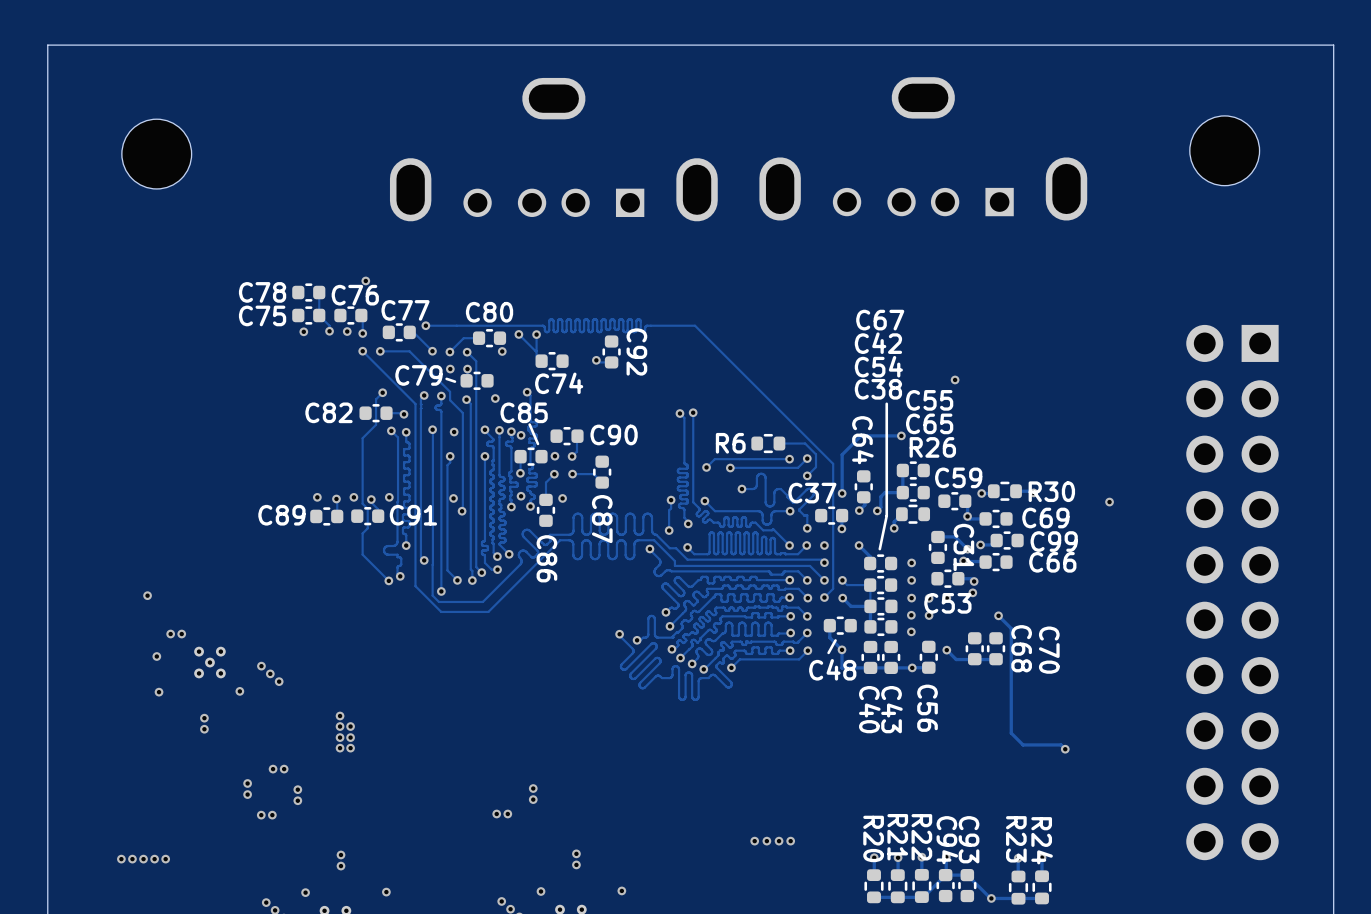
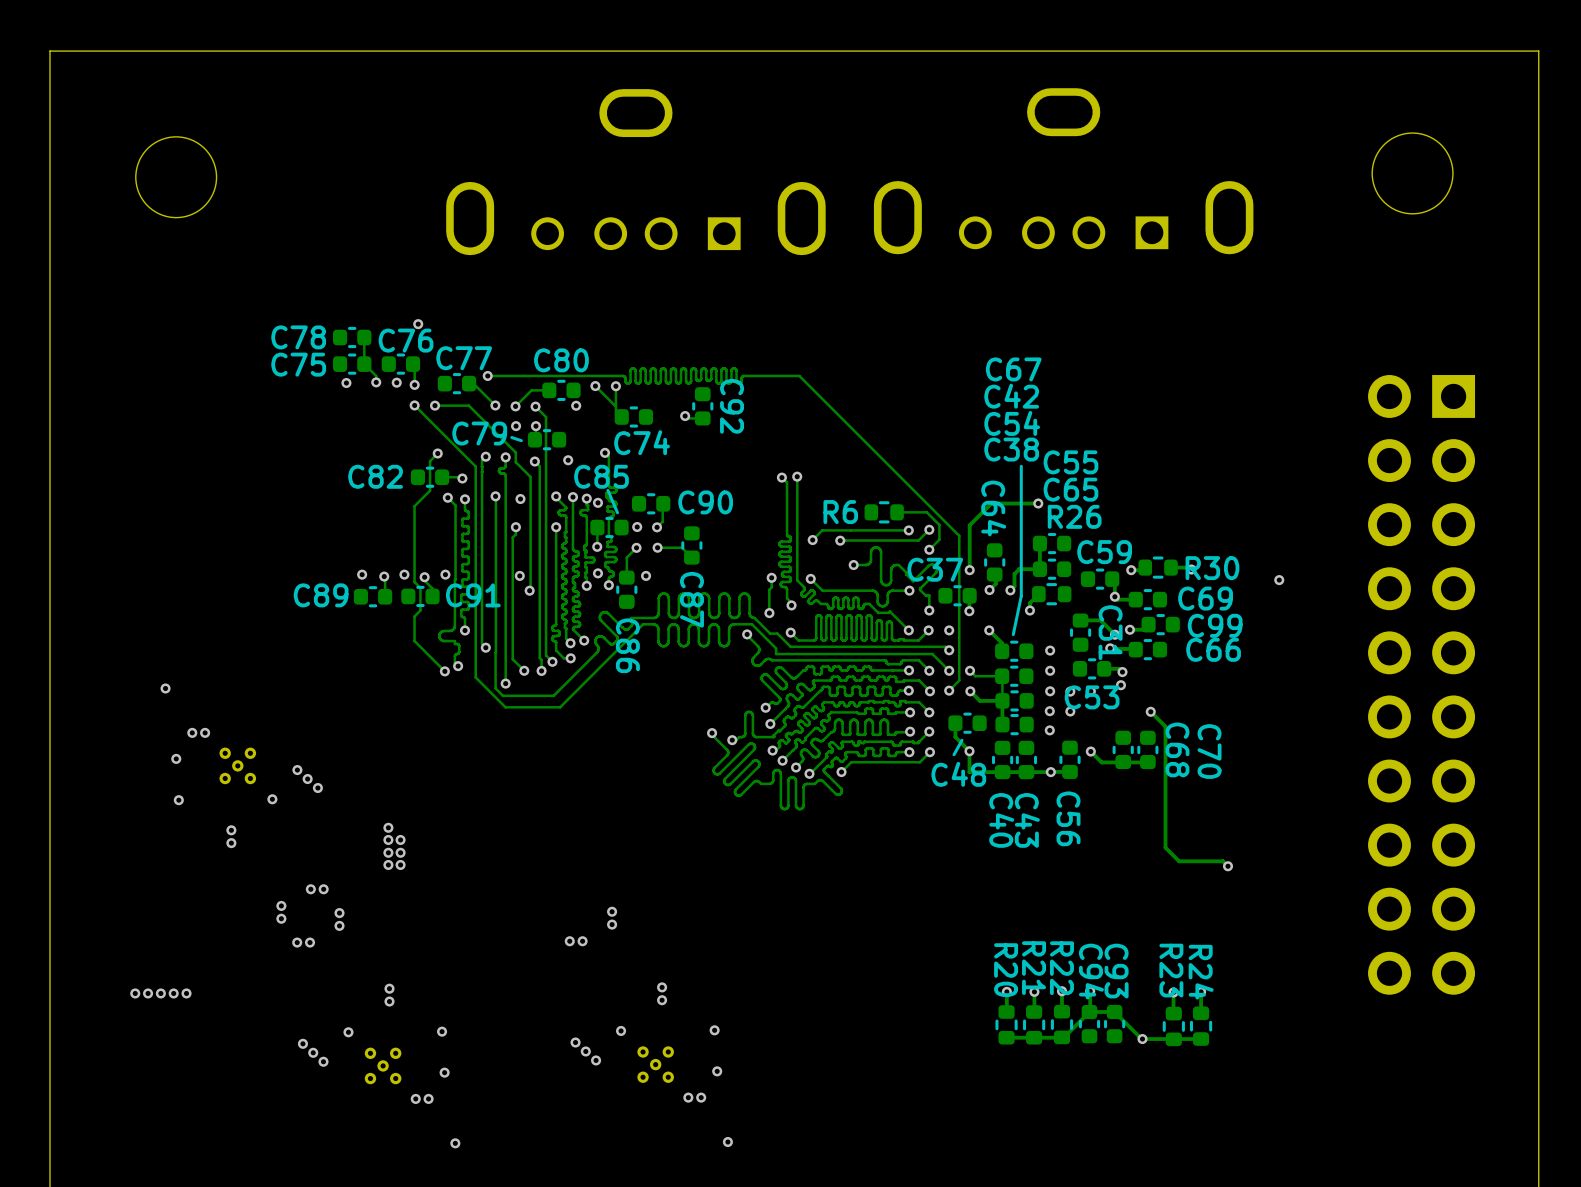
via: (955, 379) -> none
via: (754, 841) -> none
via: (766, 841) -> none
via: (779, 841) -> none
via: (790, 841) -> none

